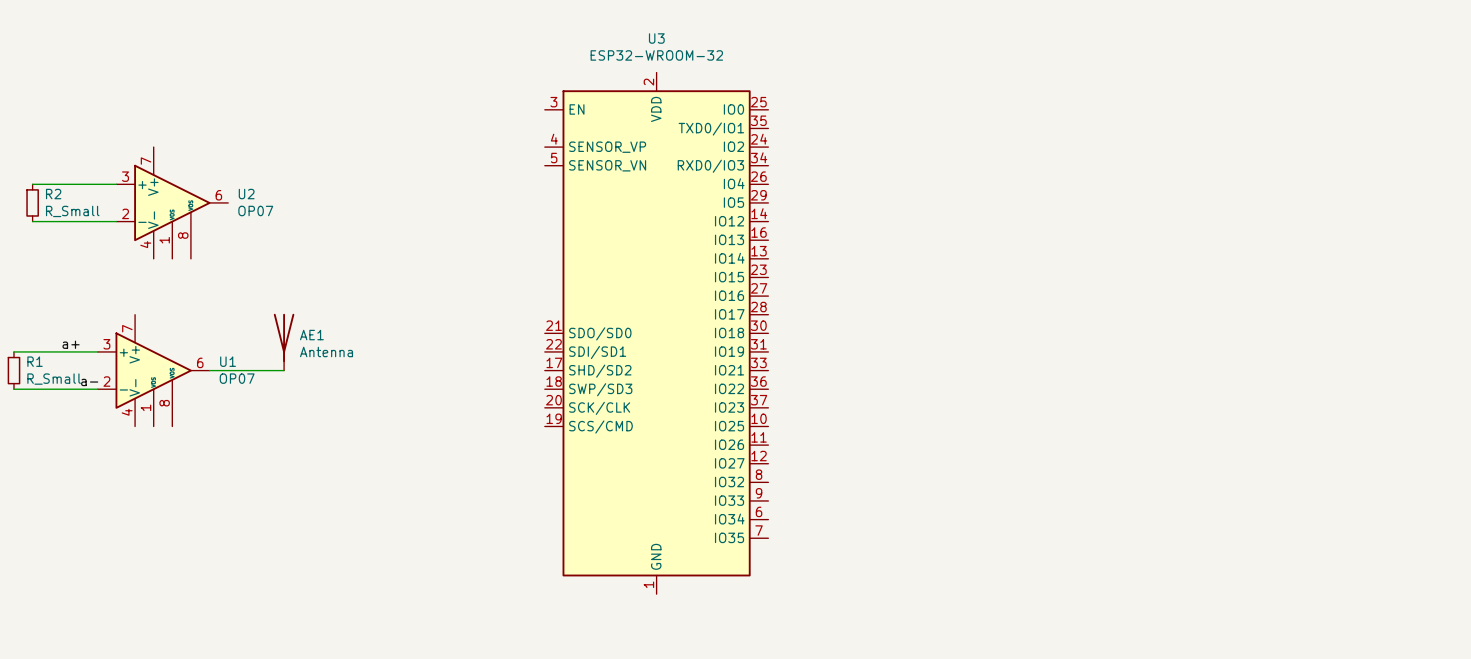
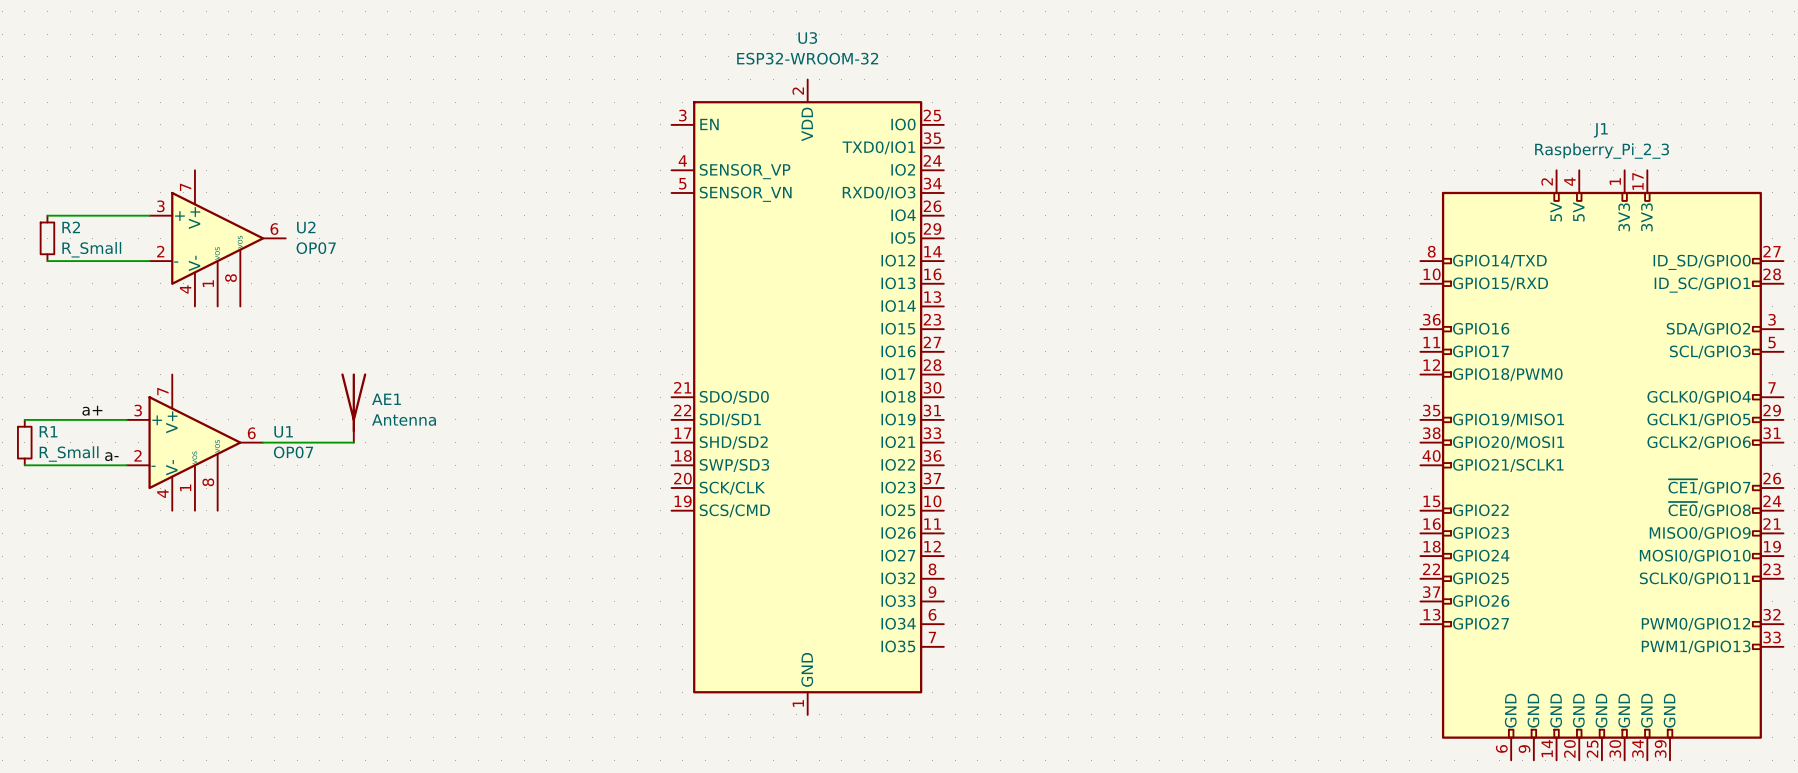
J1: none -> Raspberry_Pi_2_3 (1601, 465)

